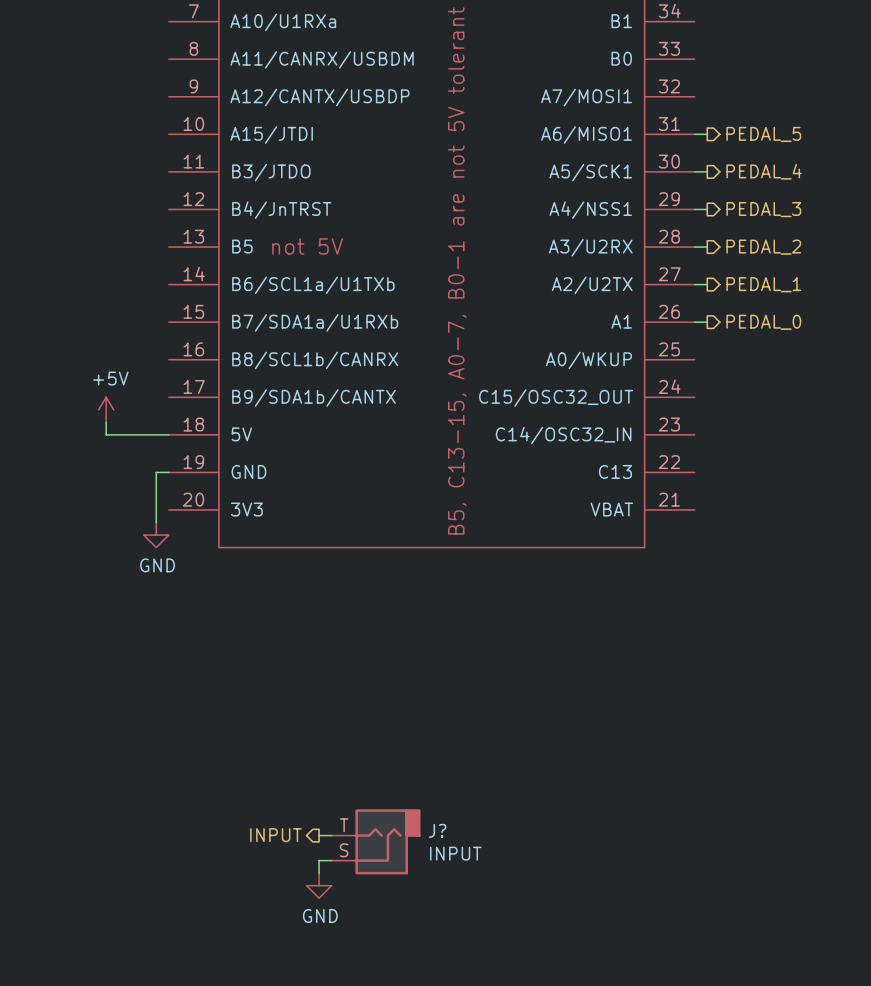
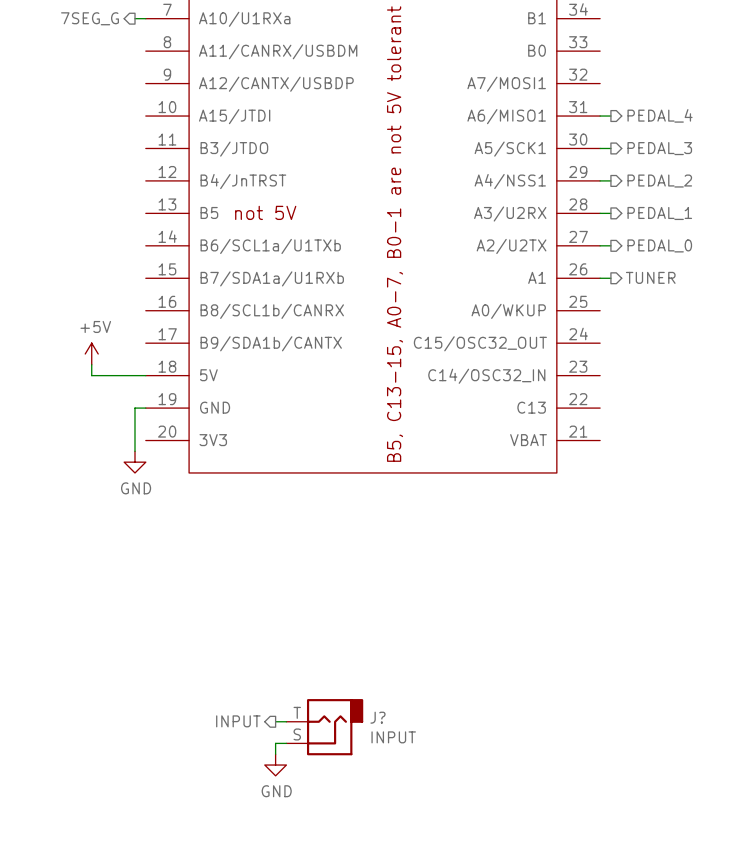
hierarchical label: none -> 7SEG_G (90, 18)
wire: none -> (134, 18) (145, 18)
hierarchical label: PEDAL_5 (763, 134) -> PEDAL_4 (660, 115)
hierarchical label: PEDAL_4 (764, 171) -> PEDAL_3 (659, 148)
hierarchical label: PEDAL_3 (763, 209) -> PEDAL_2 (659, 181)
hierarchical label: PEDAL_2 (763, 247) -> PEDAL_1 (659, 213)
hierarchical label: PEDAL_1 (763, 284) -> PEDAL_0 (659, 245)
hierarchical label: PEDAL_0 (763, 322) -> TUNER (650, 277)

